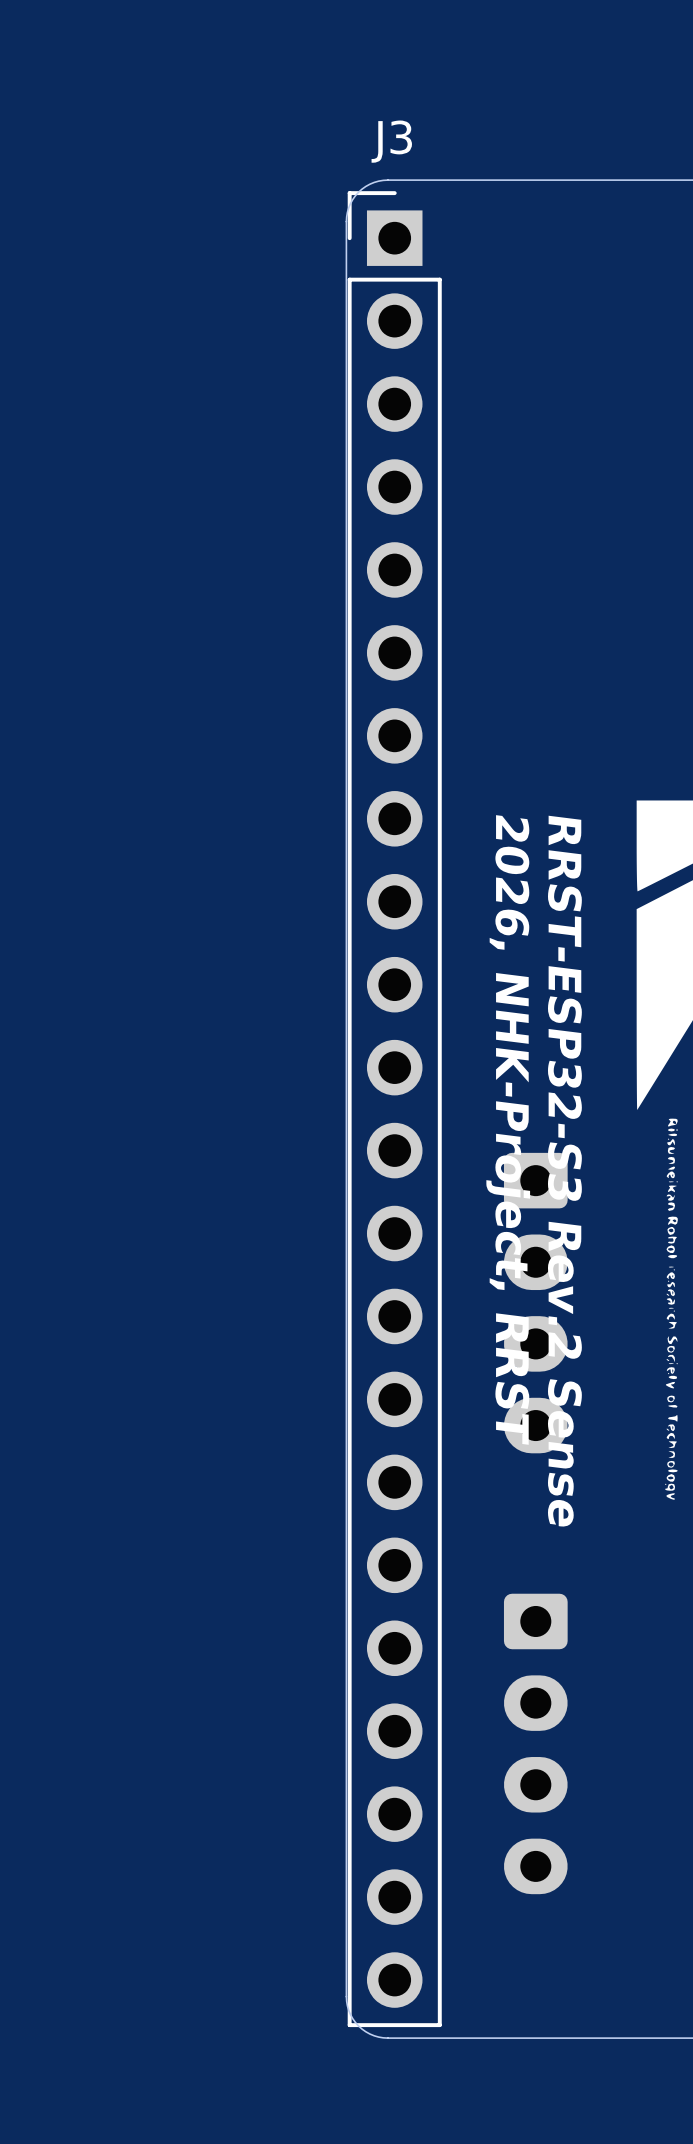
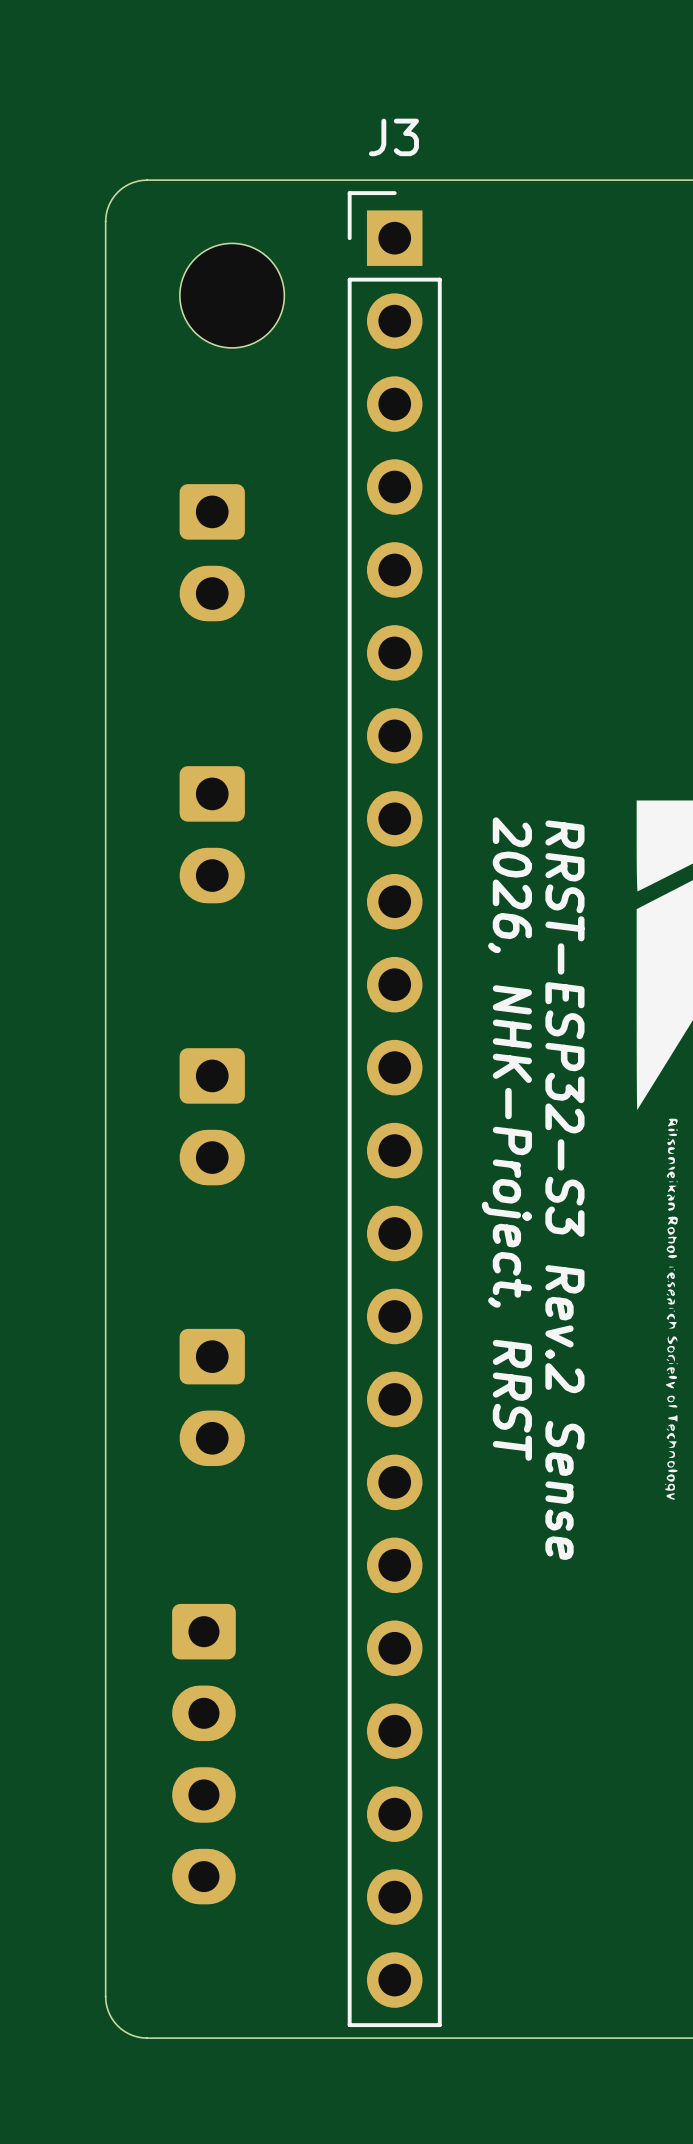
board edge: (387, 180) (374, 182) (358, 192) (350, 203) (346, 221) (346, 1996) (348, 2010) (358, 2025) (374, 2035) (387, 2038) -> (387, 180) (142, 180) (129, 184) (117, 192) (109, 203) (105, 216) (105, 1996) (109, 2014) (117, 2025) (129, 2034) (142, 2037) (387, 2038)
part: none -> (232, 295)
part: none -> (212, 552)
part: none -> (212, 834)
part: none -> (212, 1116)
part: (535, 1303) -> none
part: none -> (212, 1397)
part: (535, 1743) -> none
part: none -> (203, 1754)

